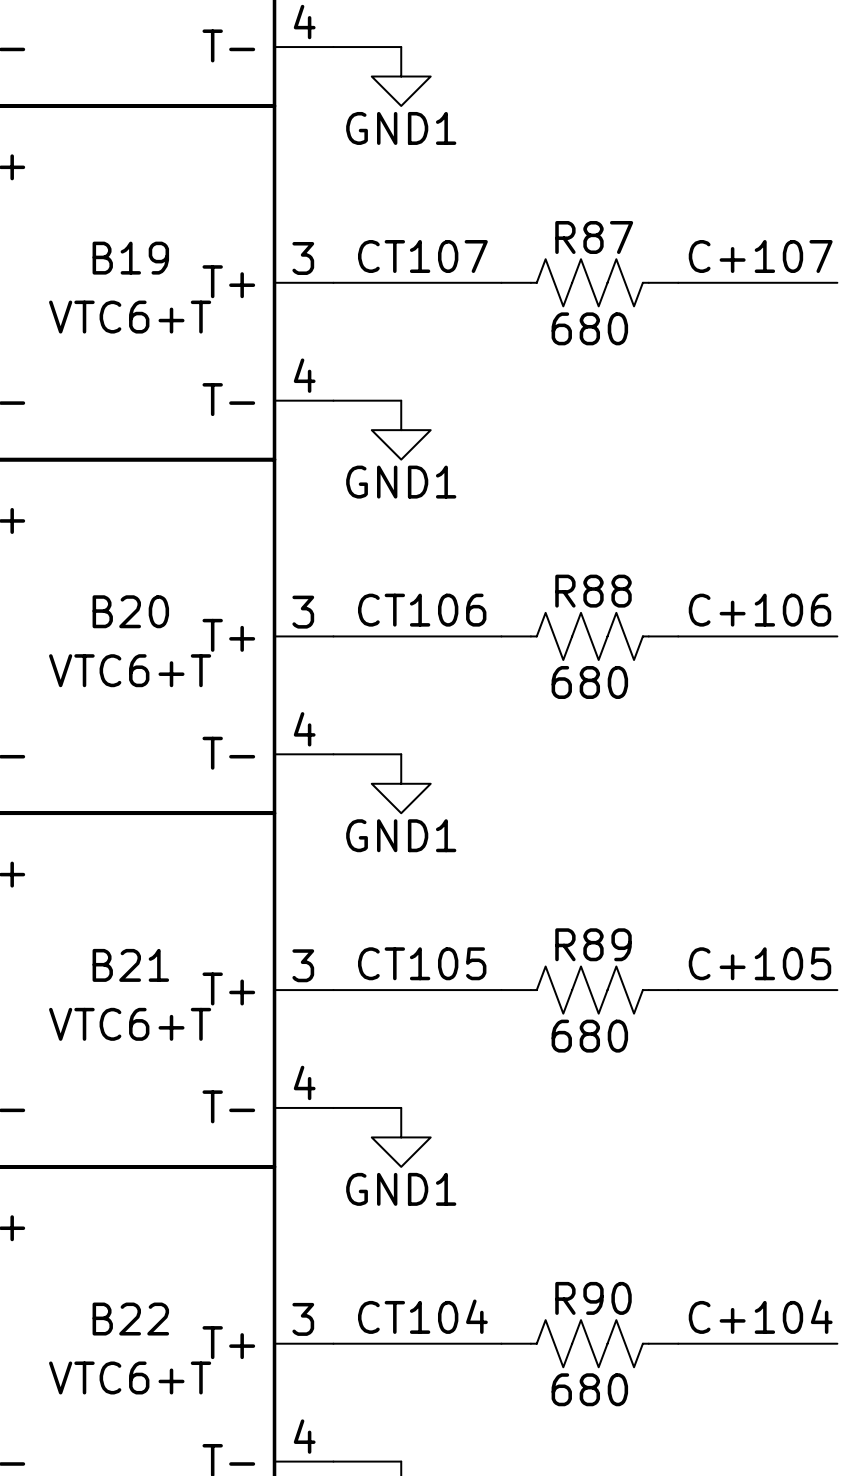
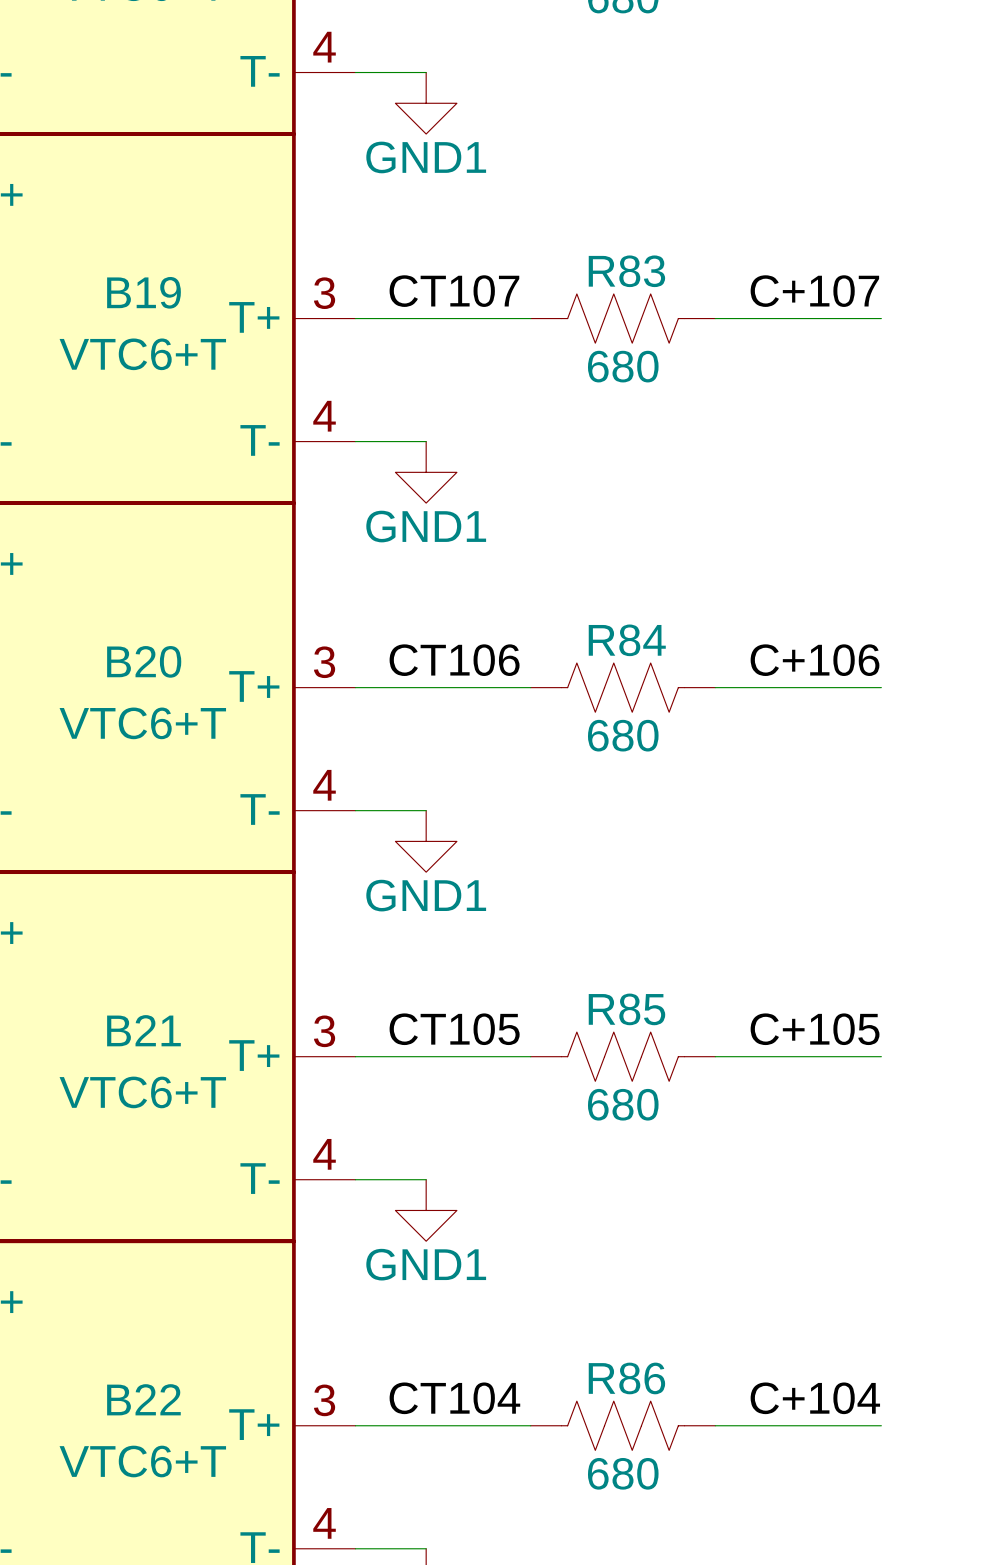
R87 name: R87 (594, 237) -> R83 (626, 271)
R88 name: R88 (593, 591) -> R84 (627, 640)
R89 name: R89 (593, 944) -> R85 (626, 1009)
R90 name: R90 (593, 1298) -> R86 (626, 1378)

